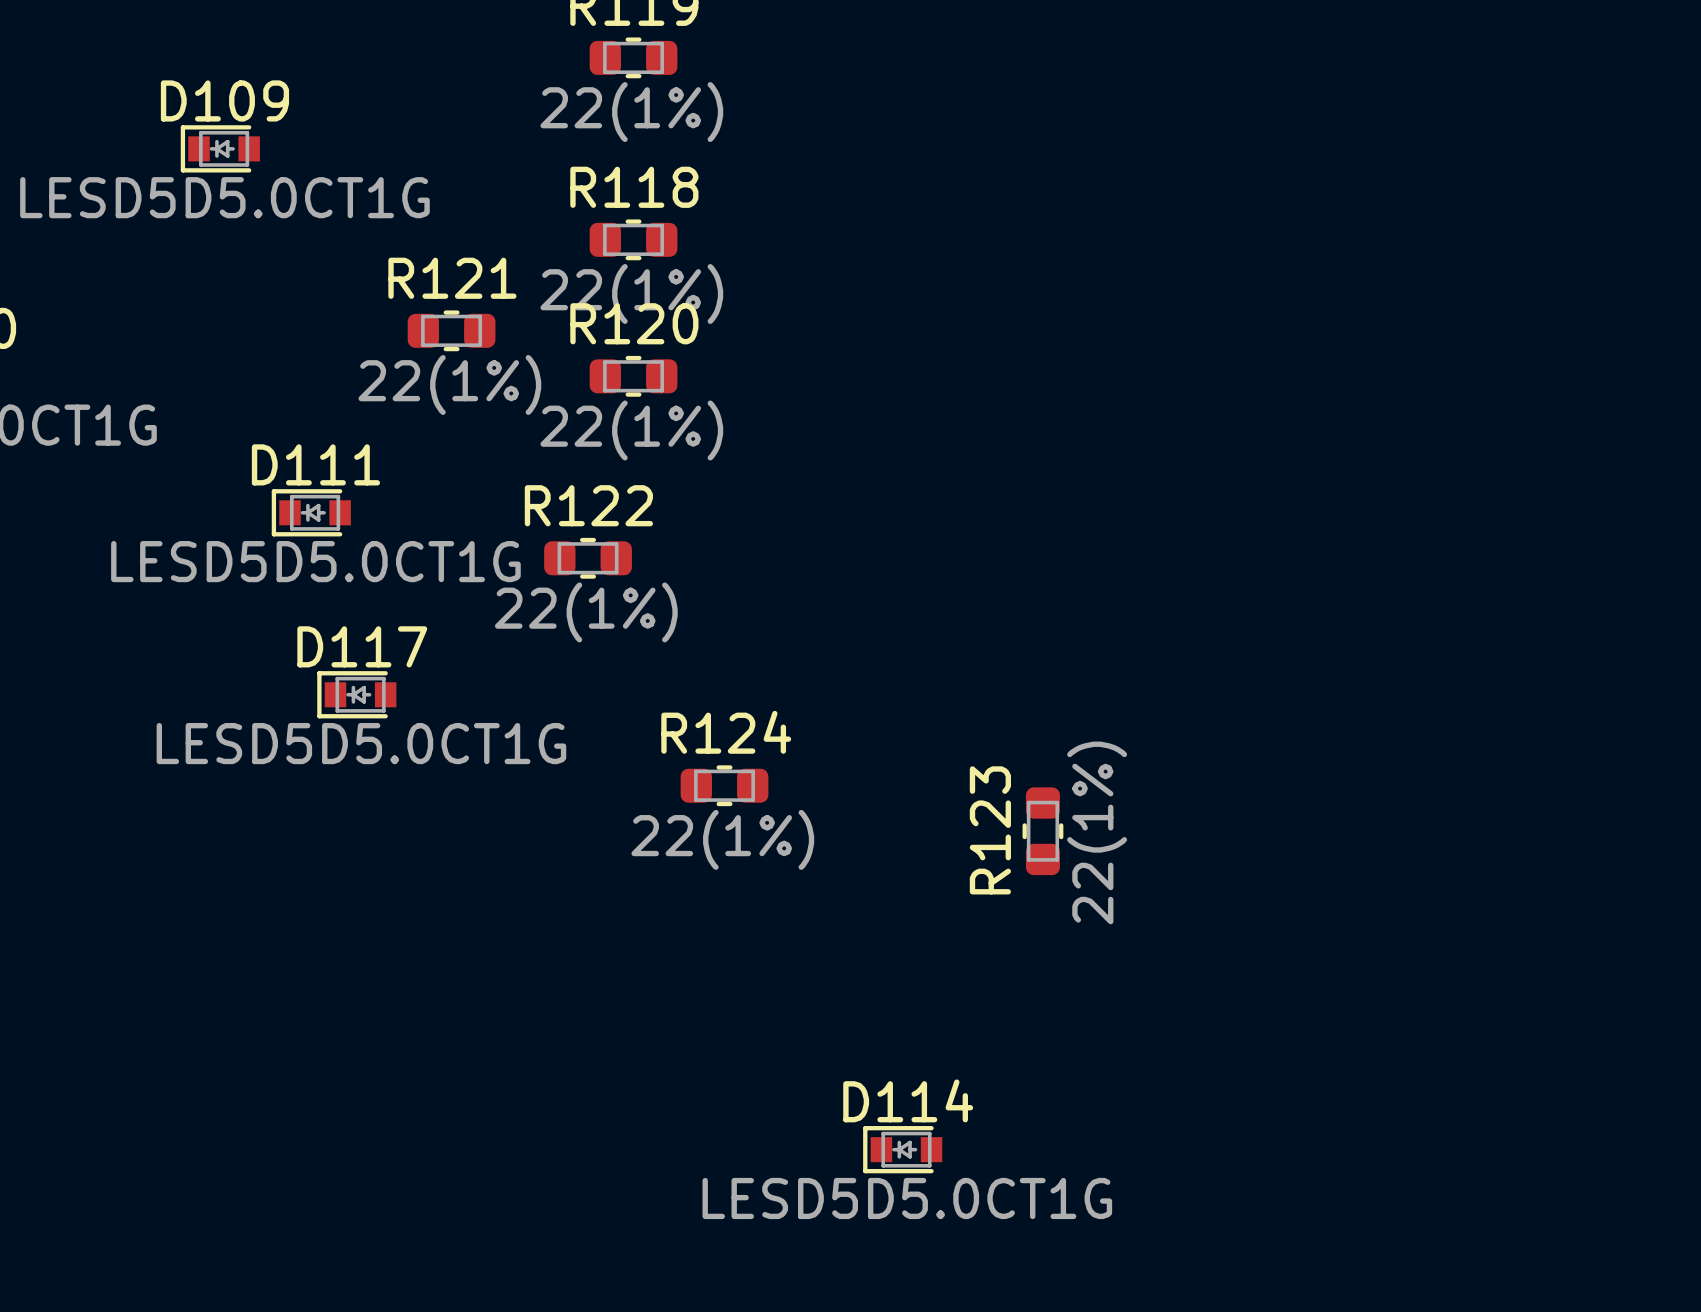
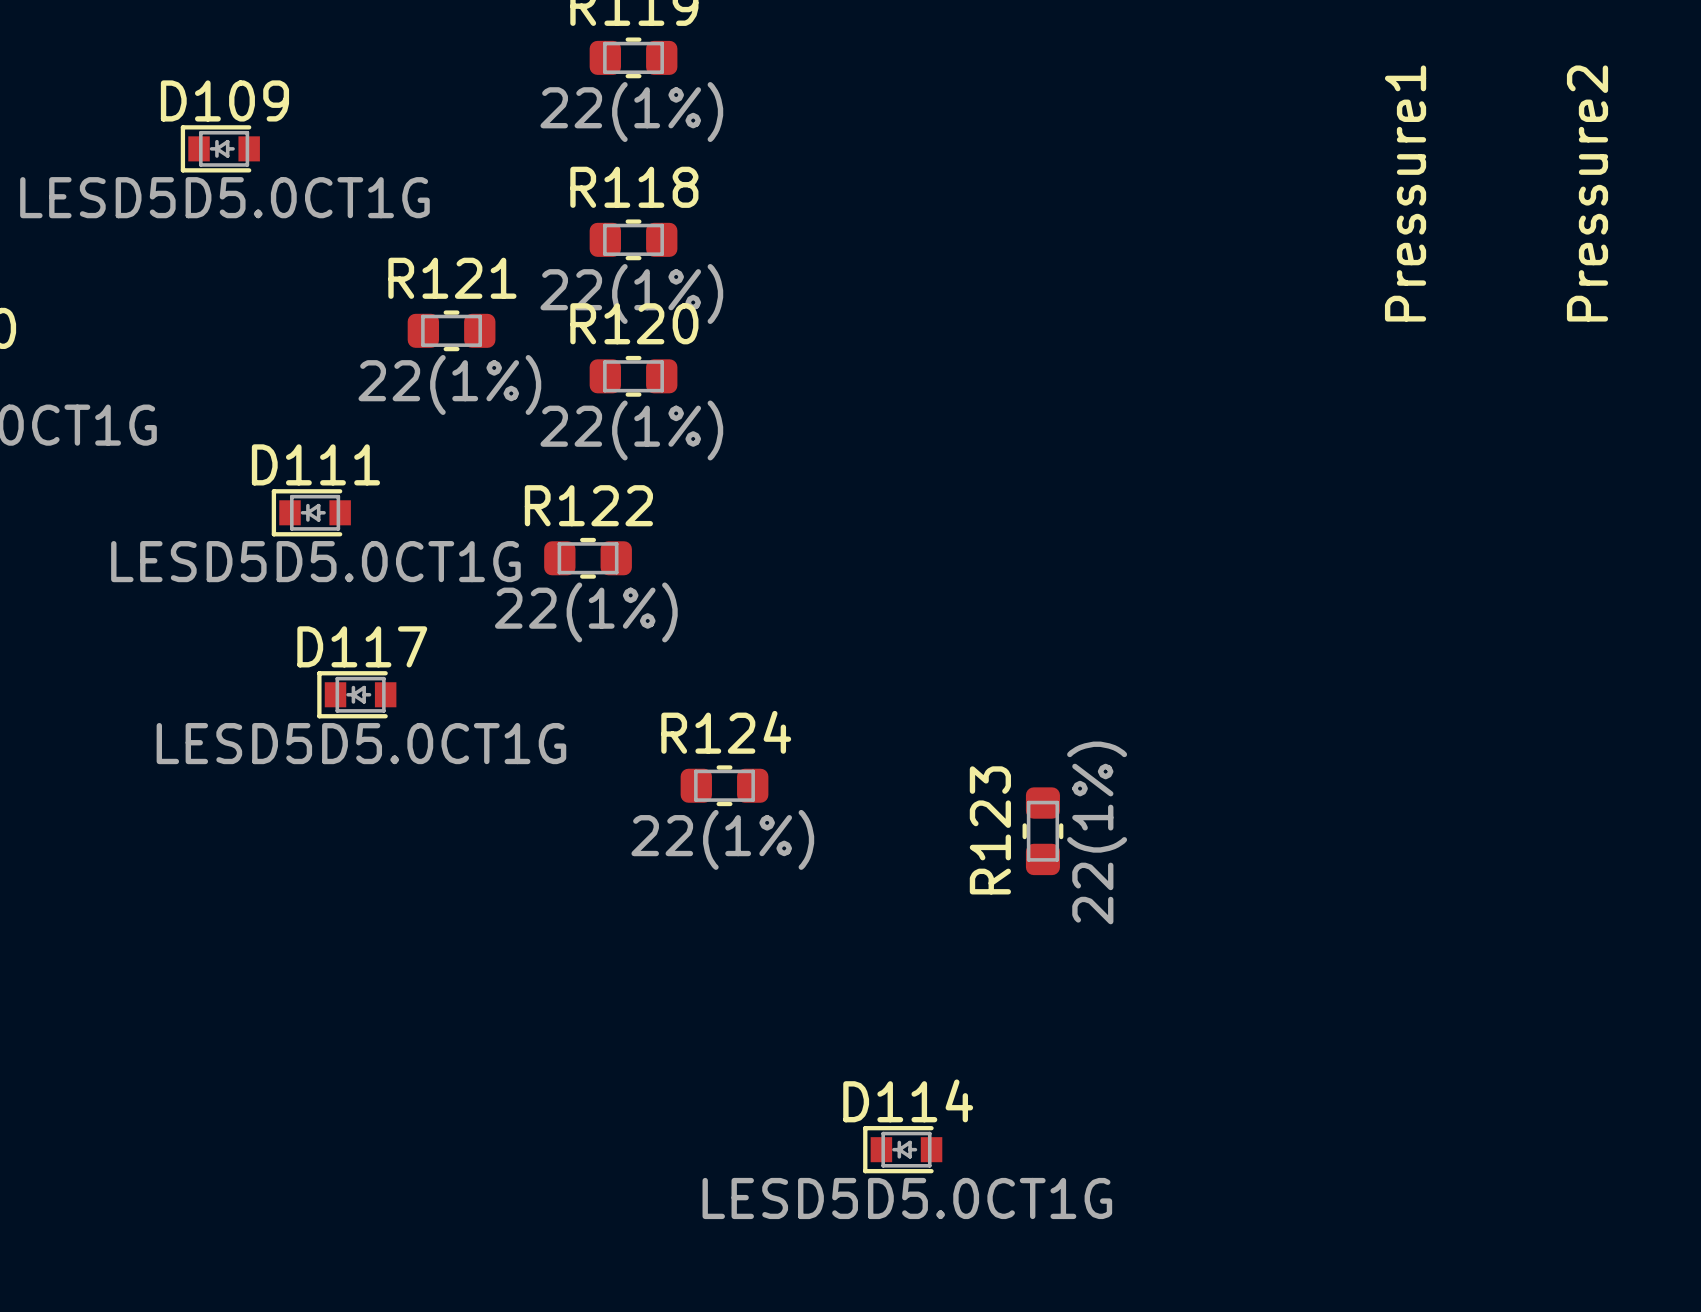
text: none -> Pressure1 (1405, 193)
text: none -> Pressure2 (1587, 193)

